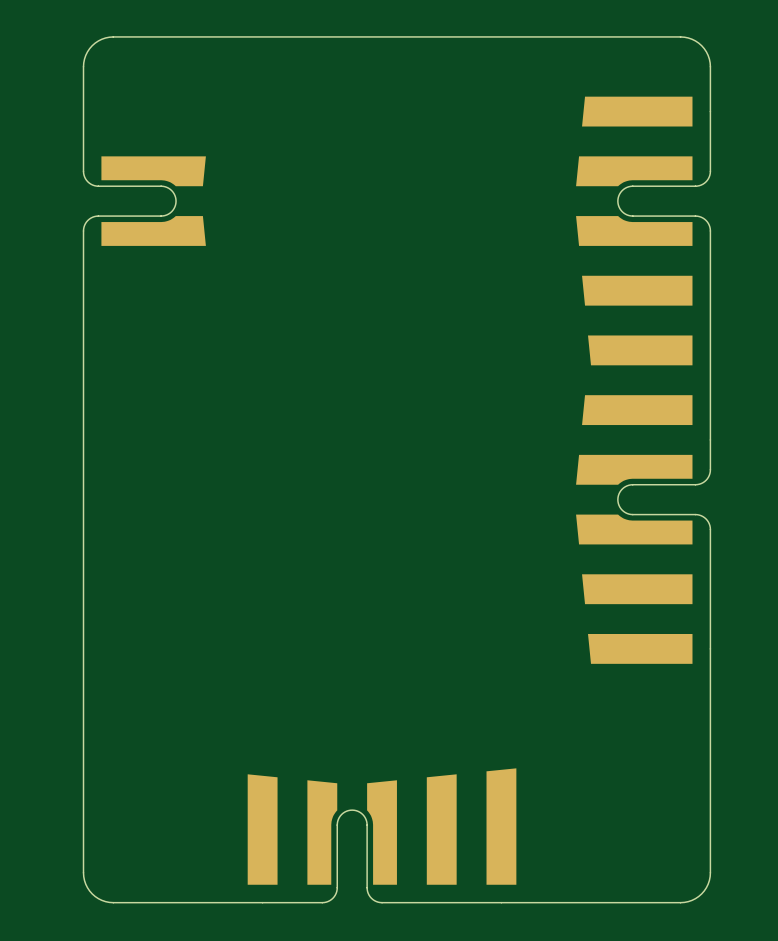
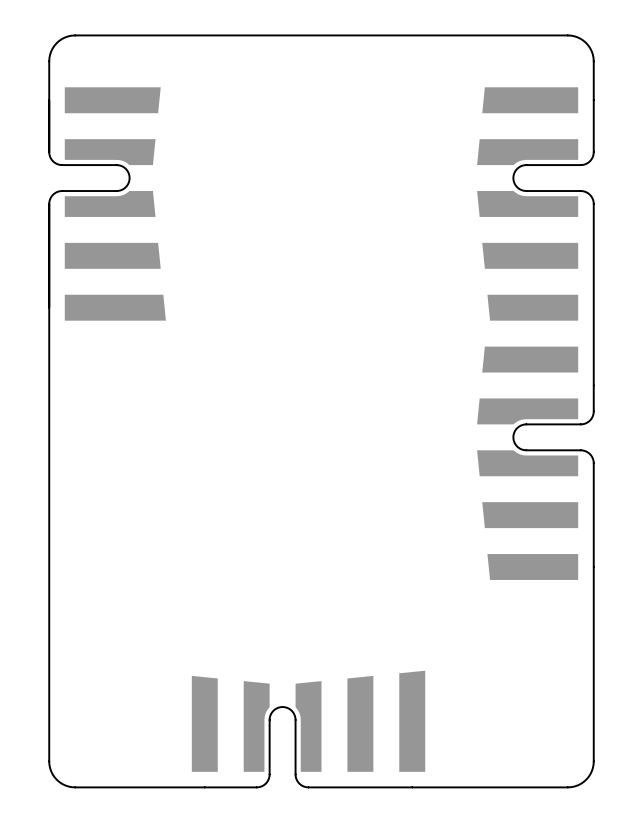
part: (144, 201) -> none
part: none -> (107, 203)

